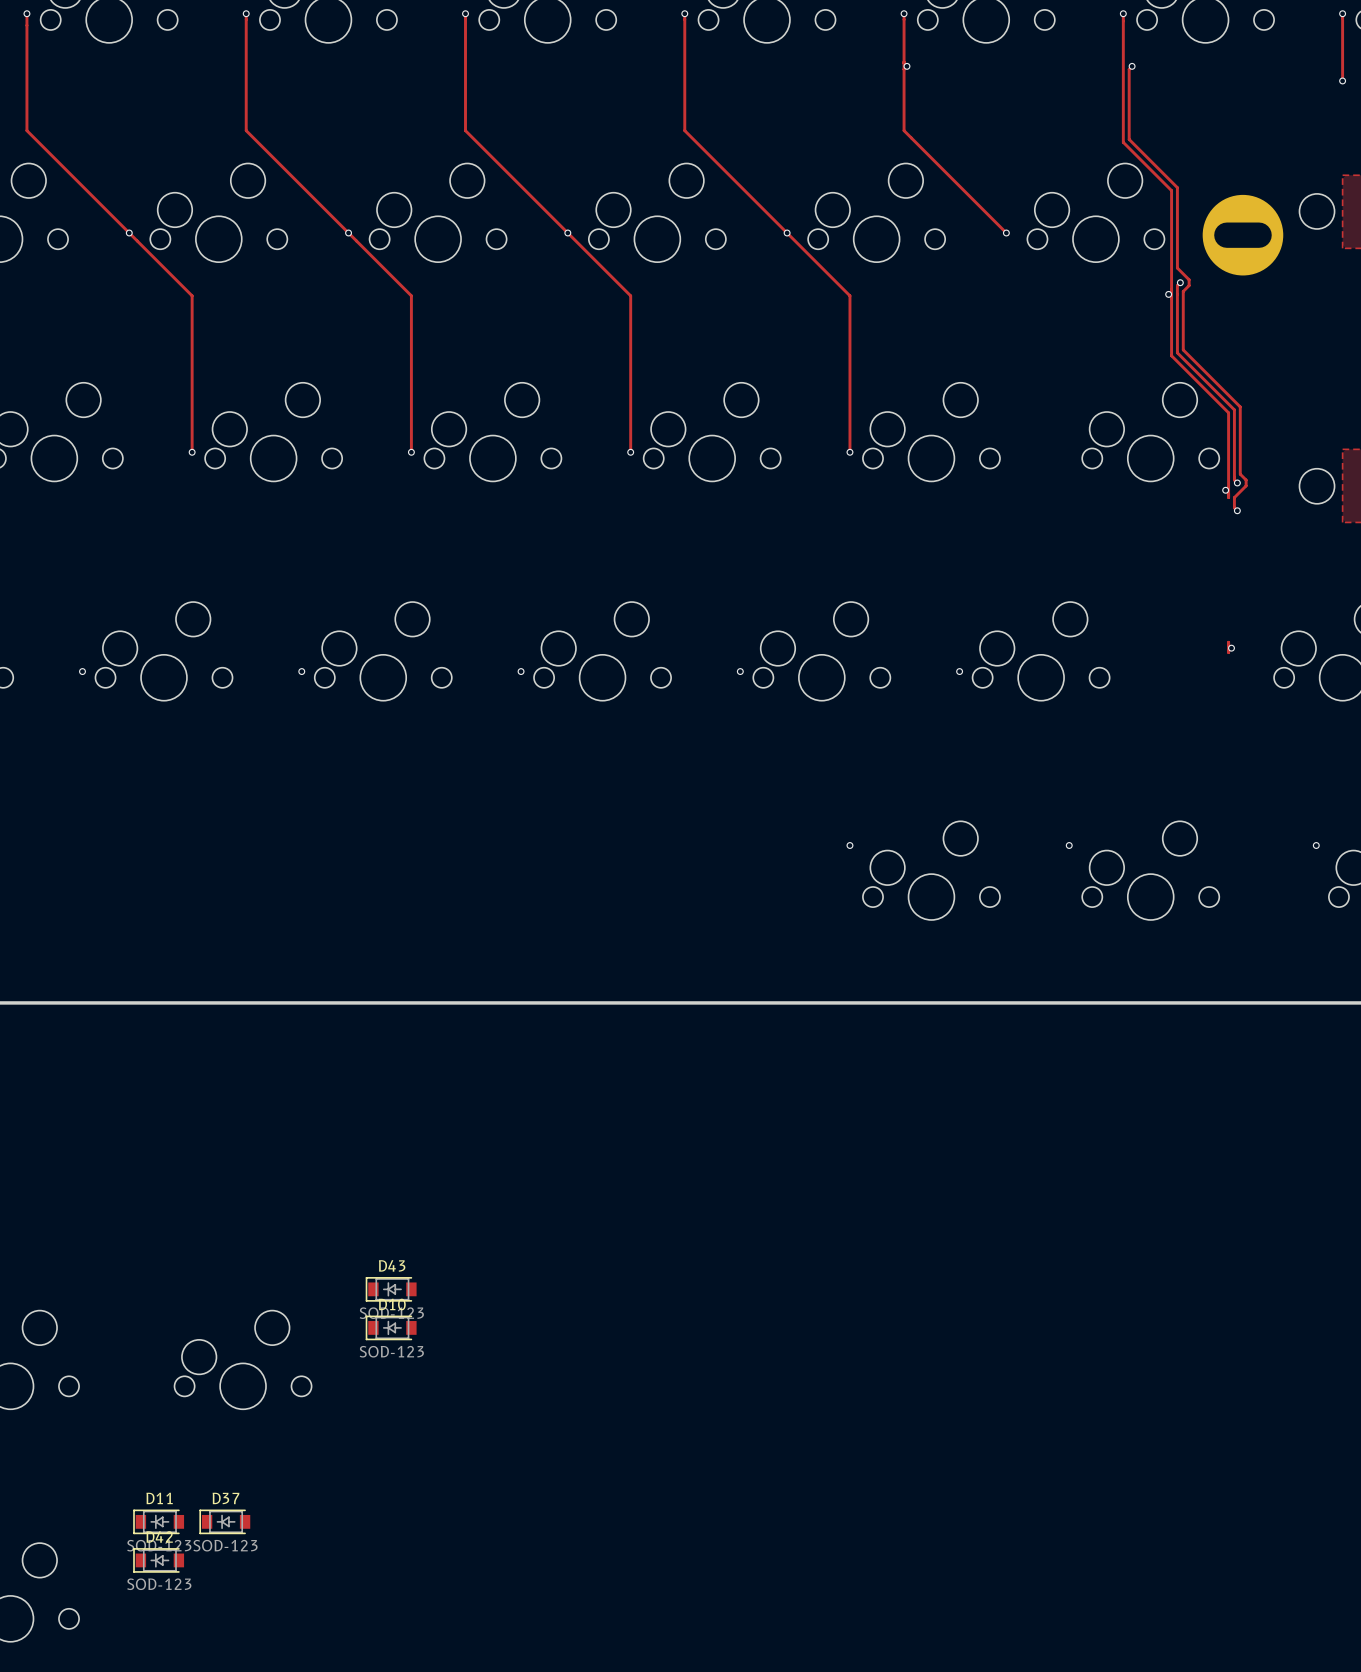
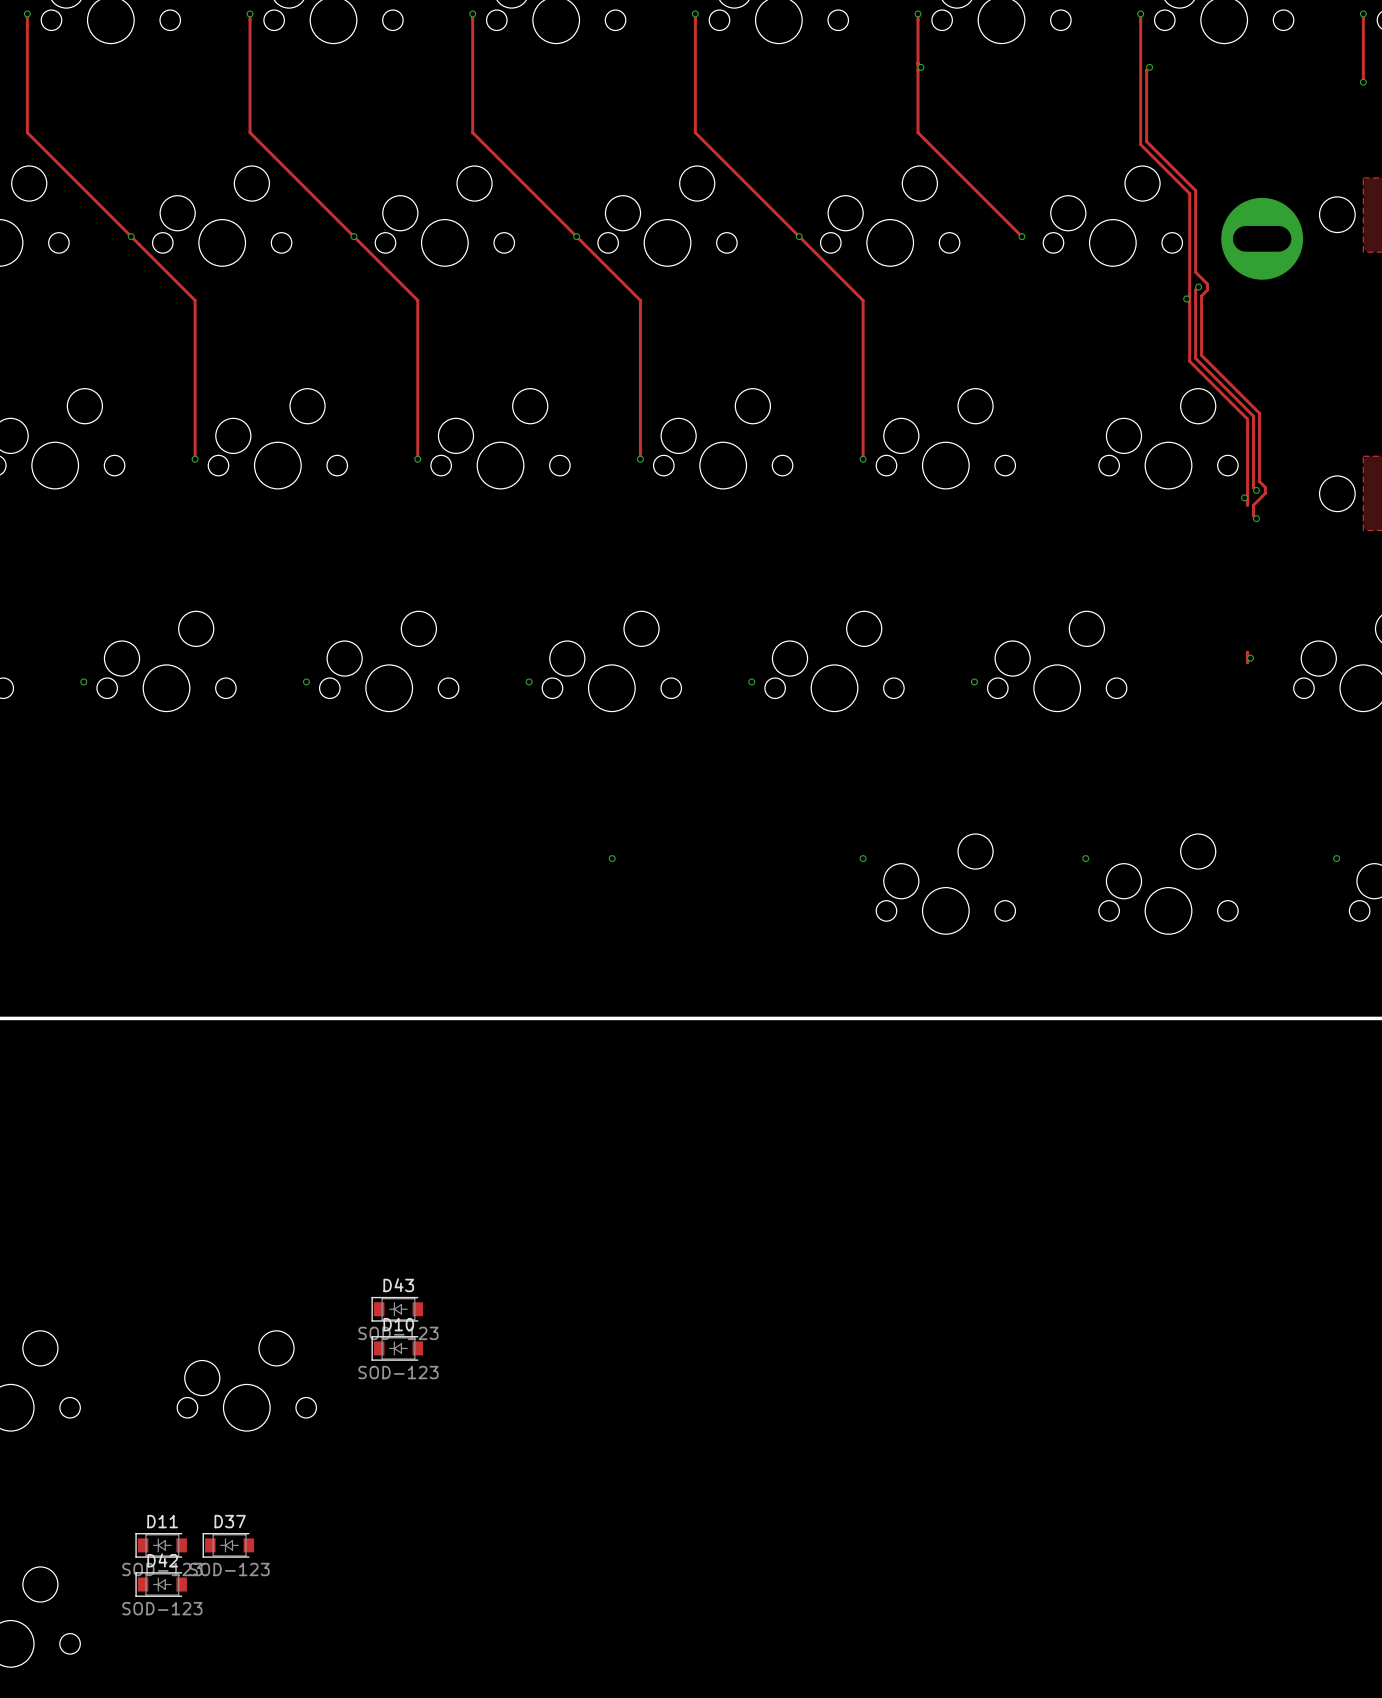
via: none -> (612, 858)

